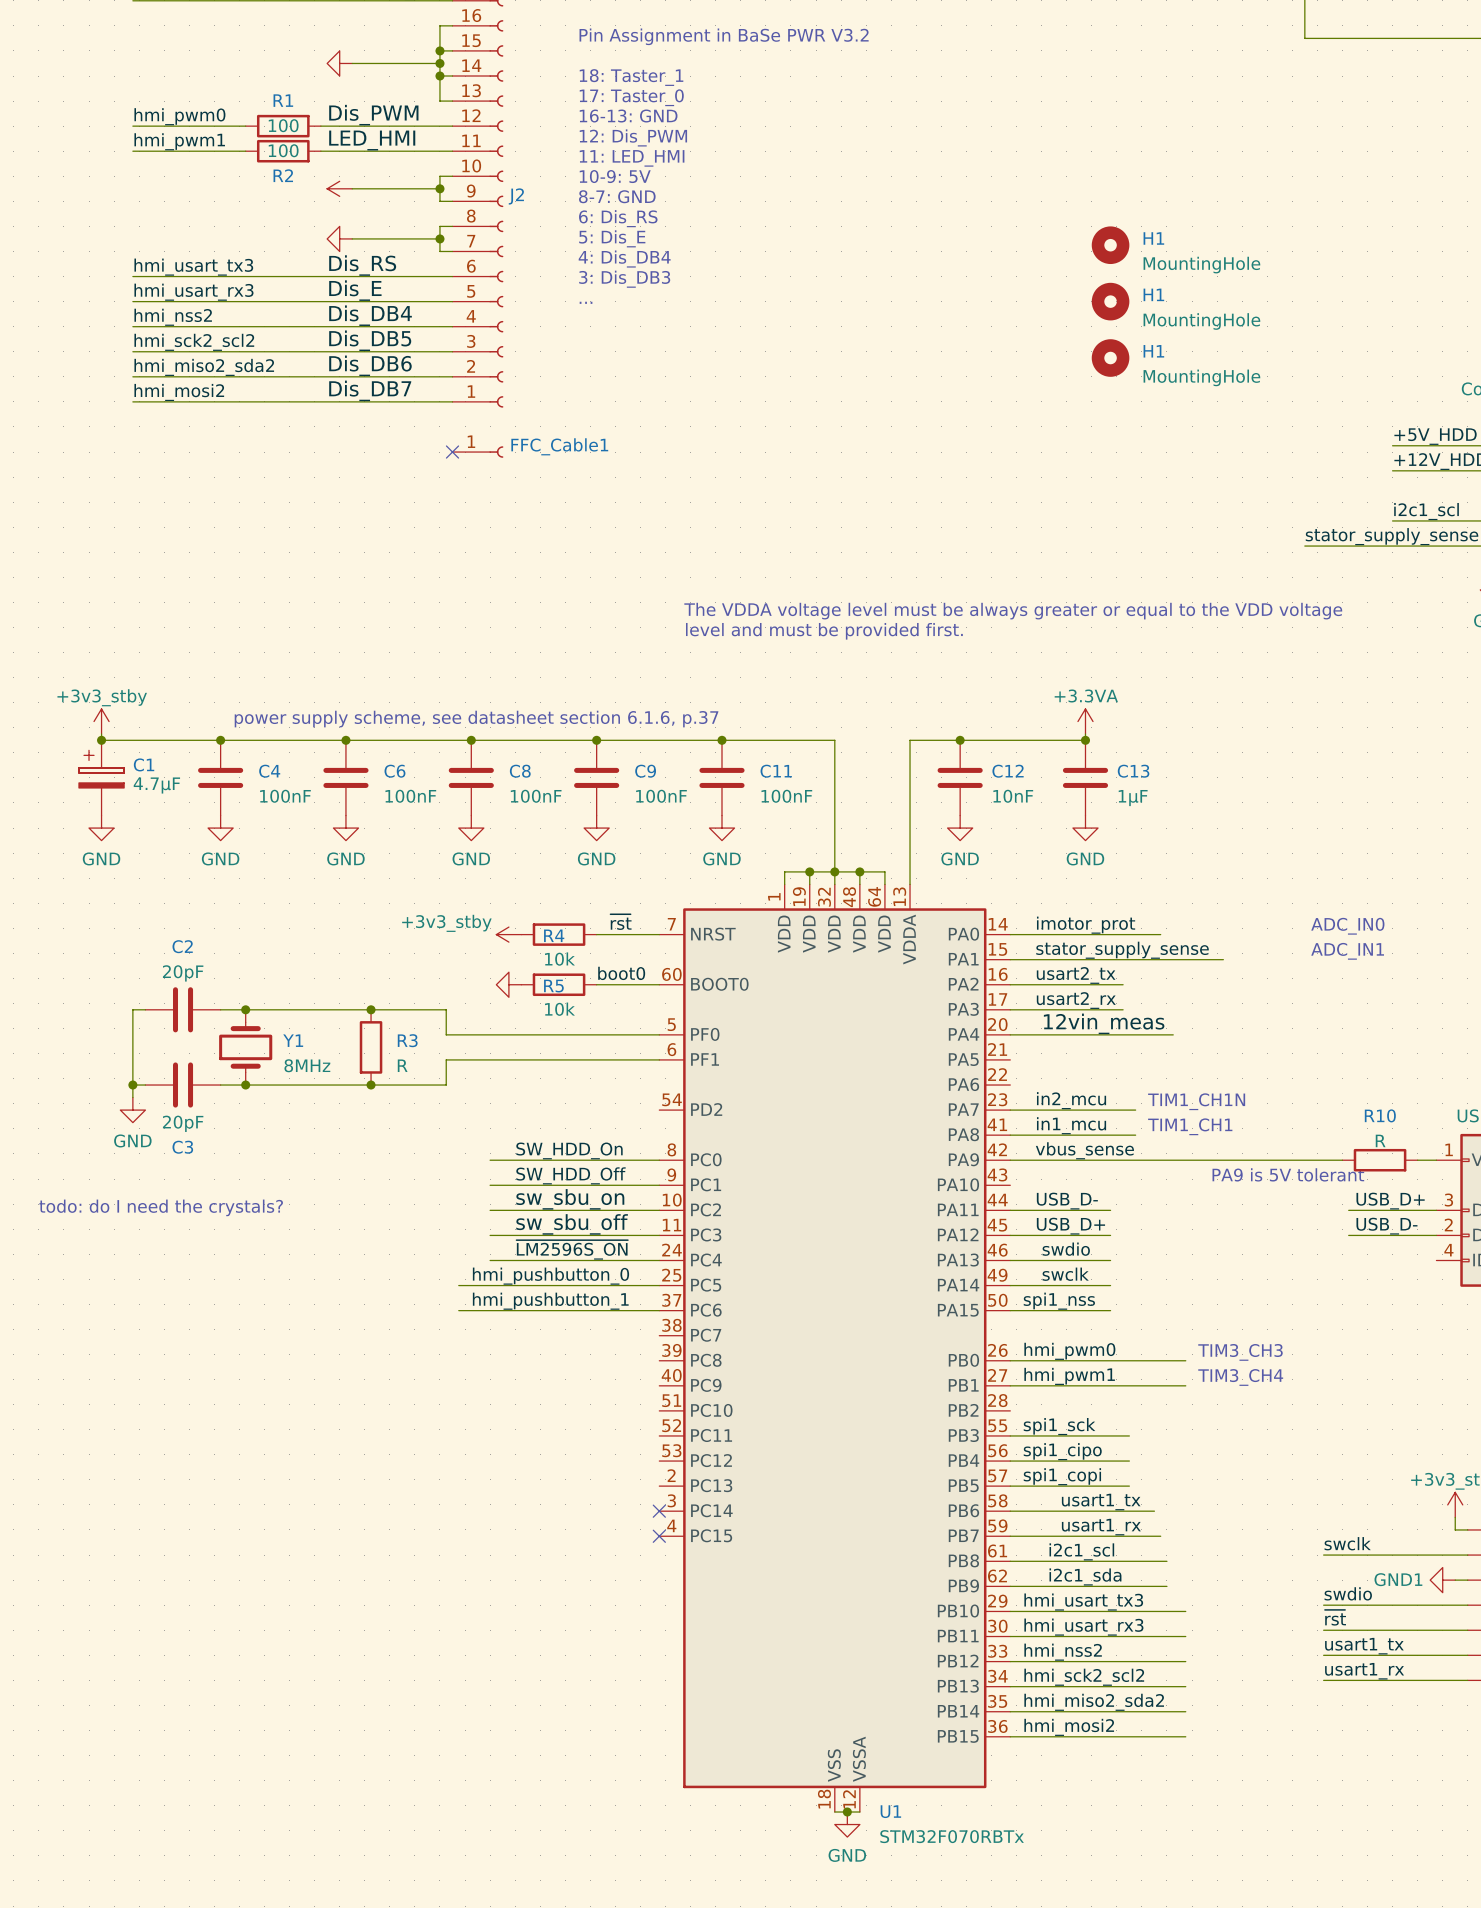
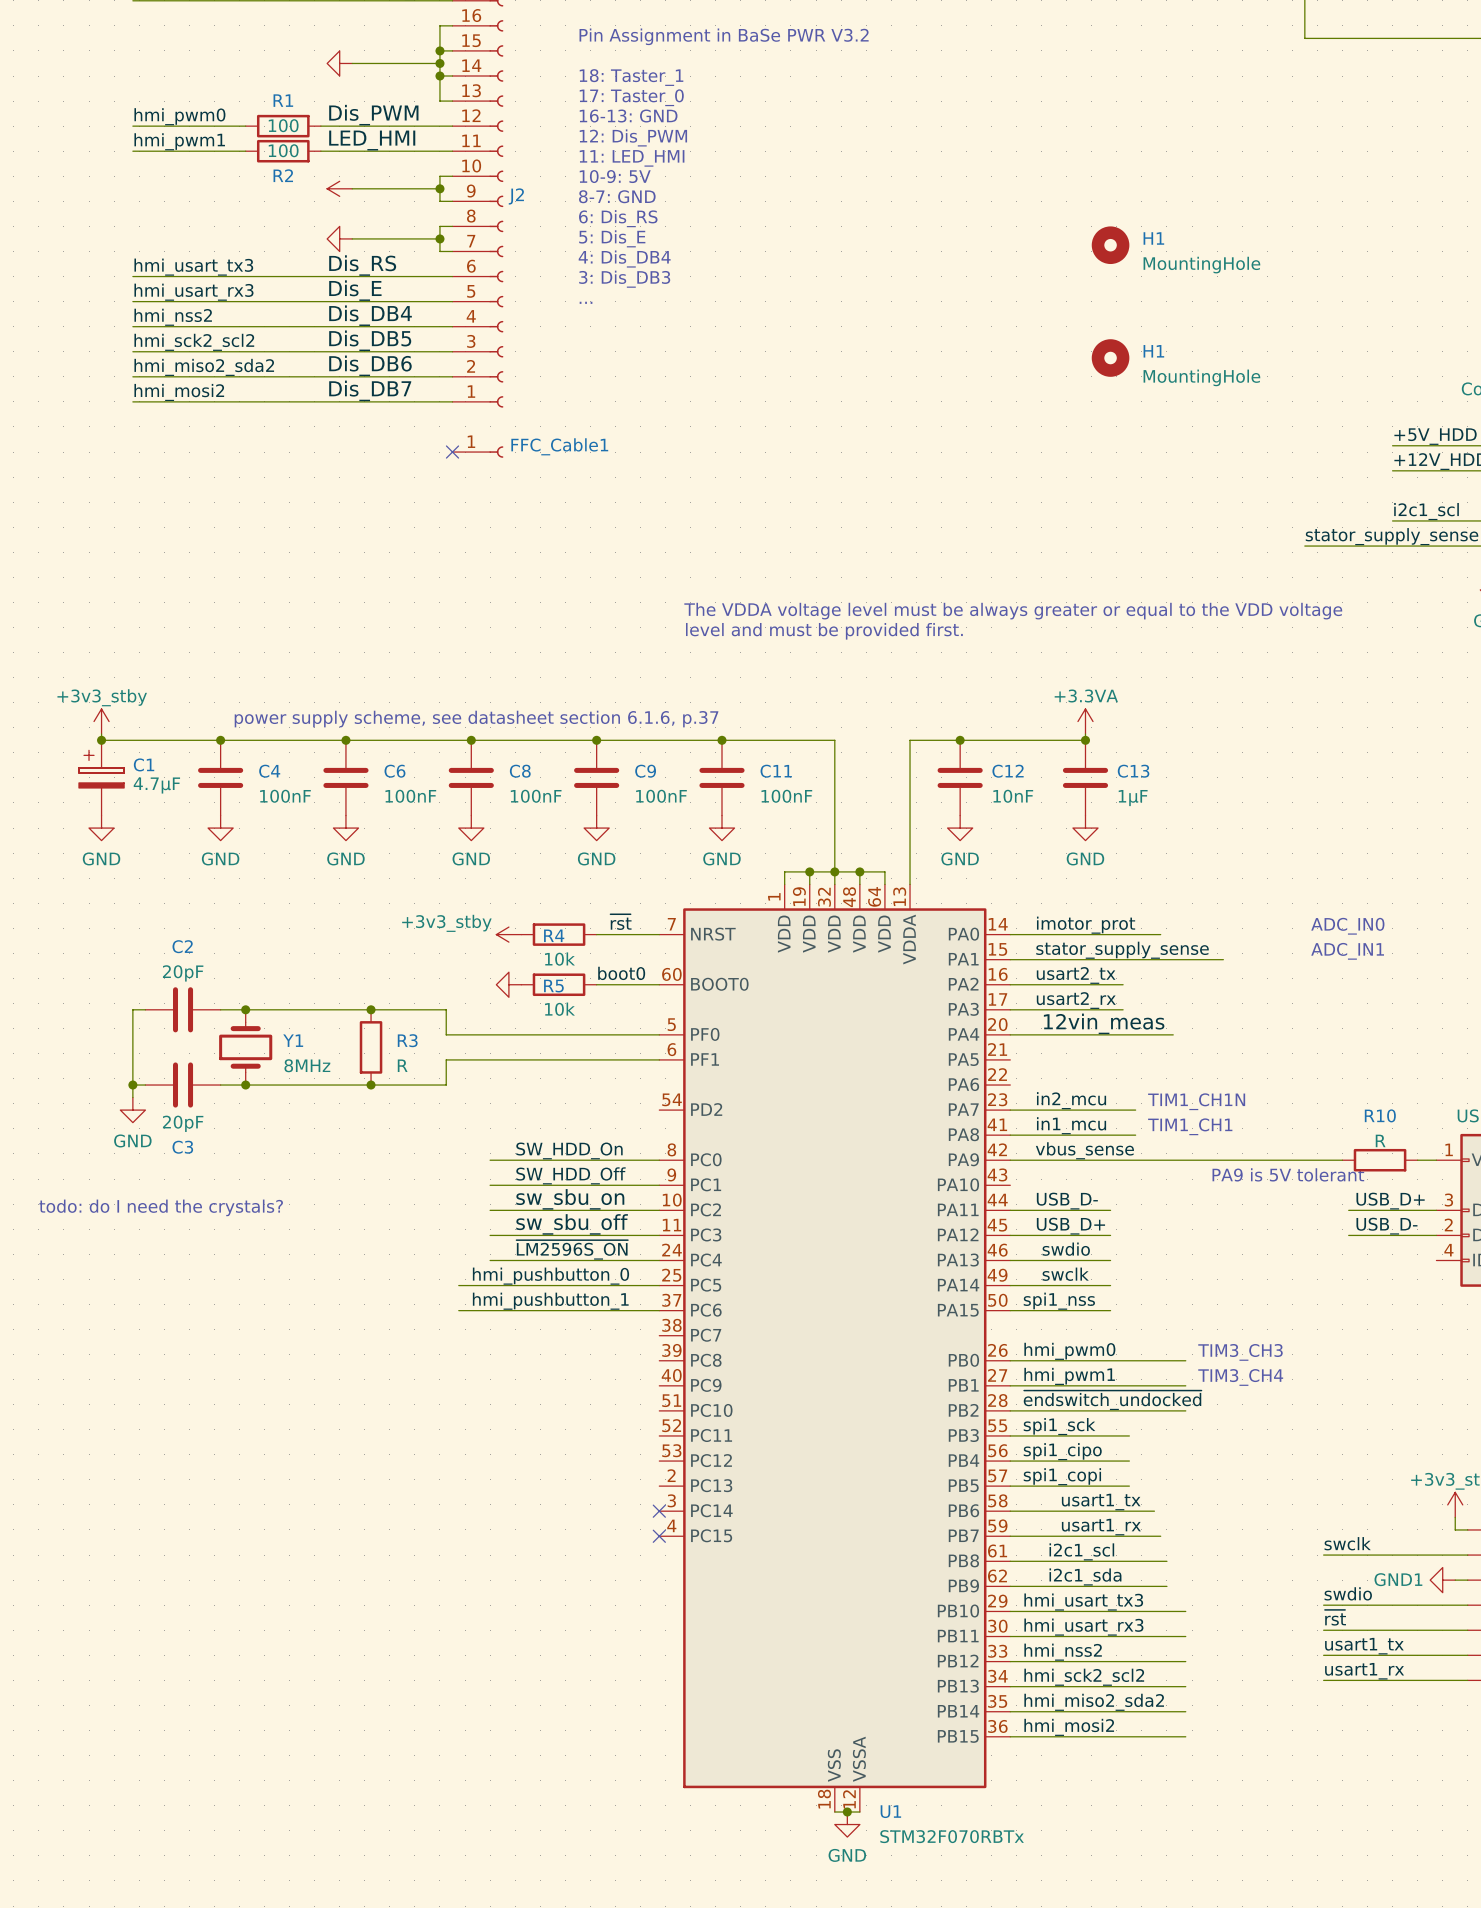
H1: MountingHole (1110, 301) -> none
label: none -> ~{endswitch_undocked} (1112, 1400)
wire: none -> (1010, 1410) (1185, 1410)

